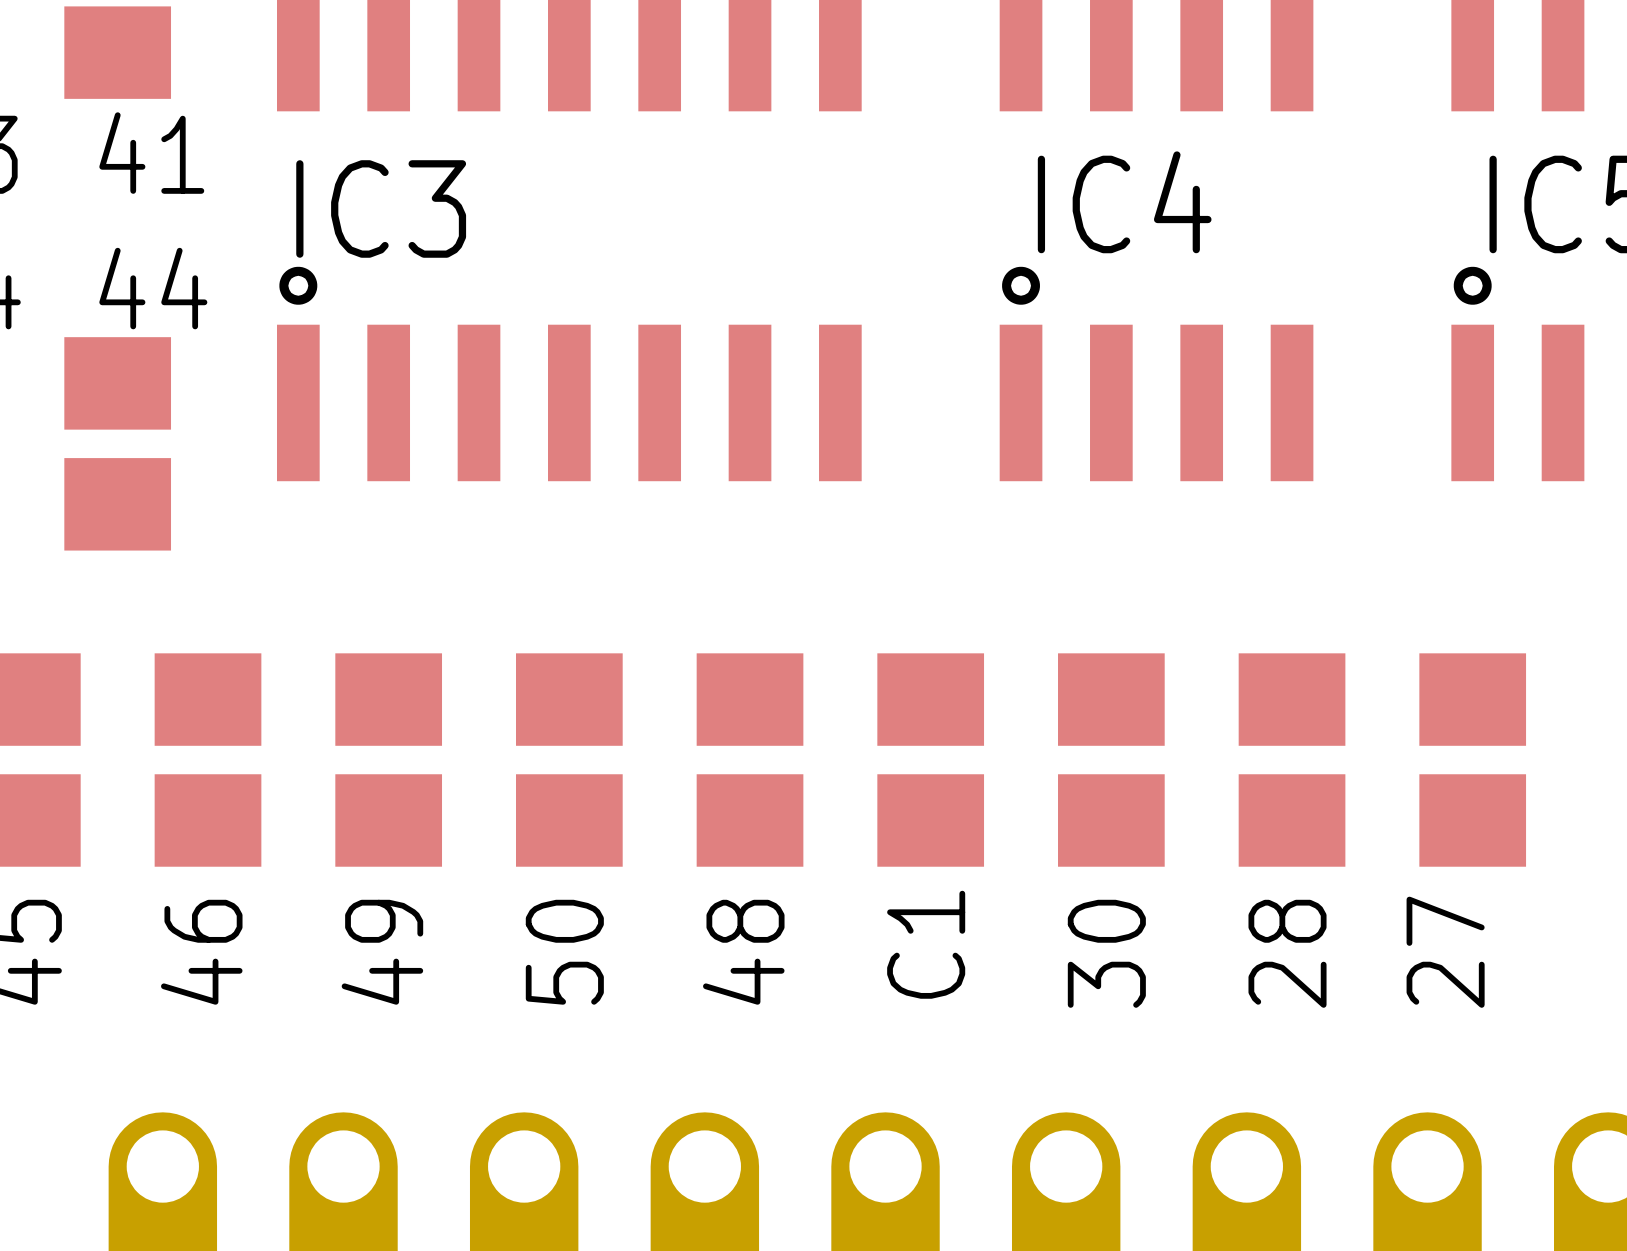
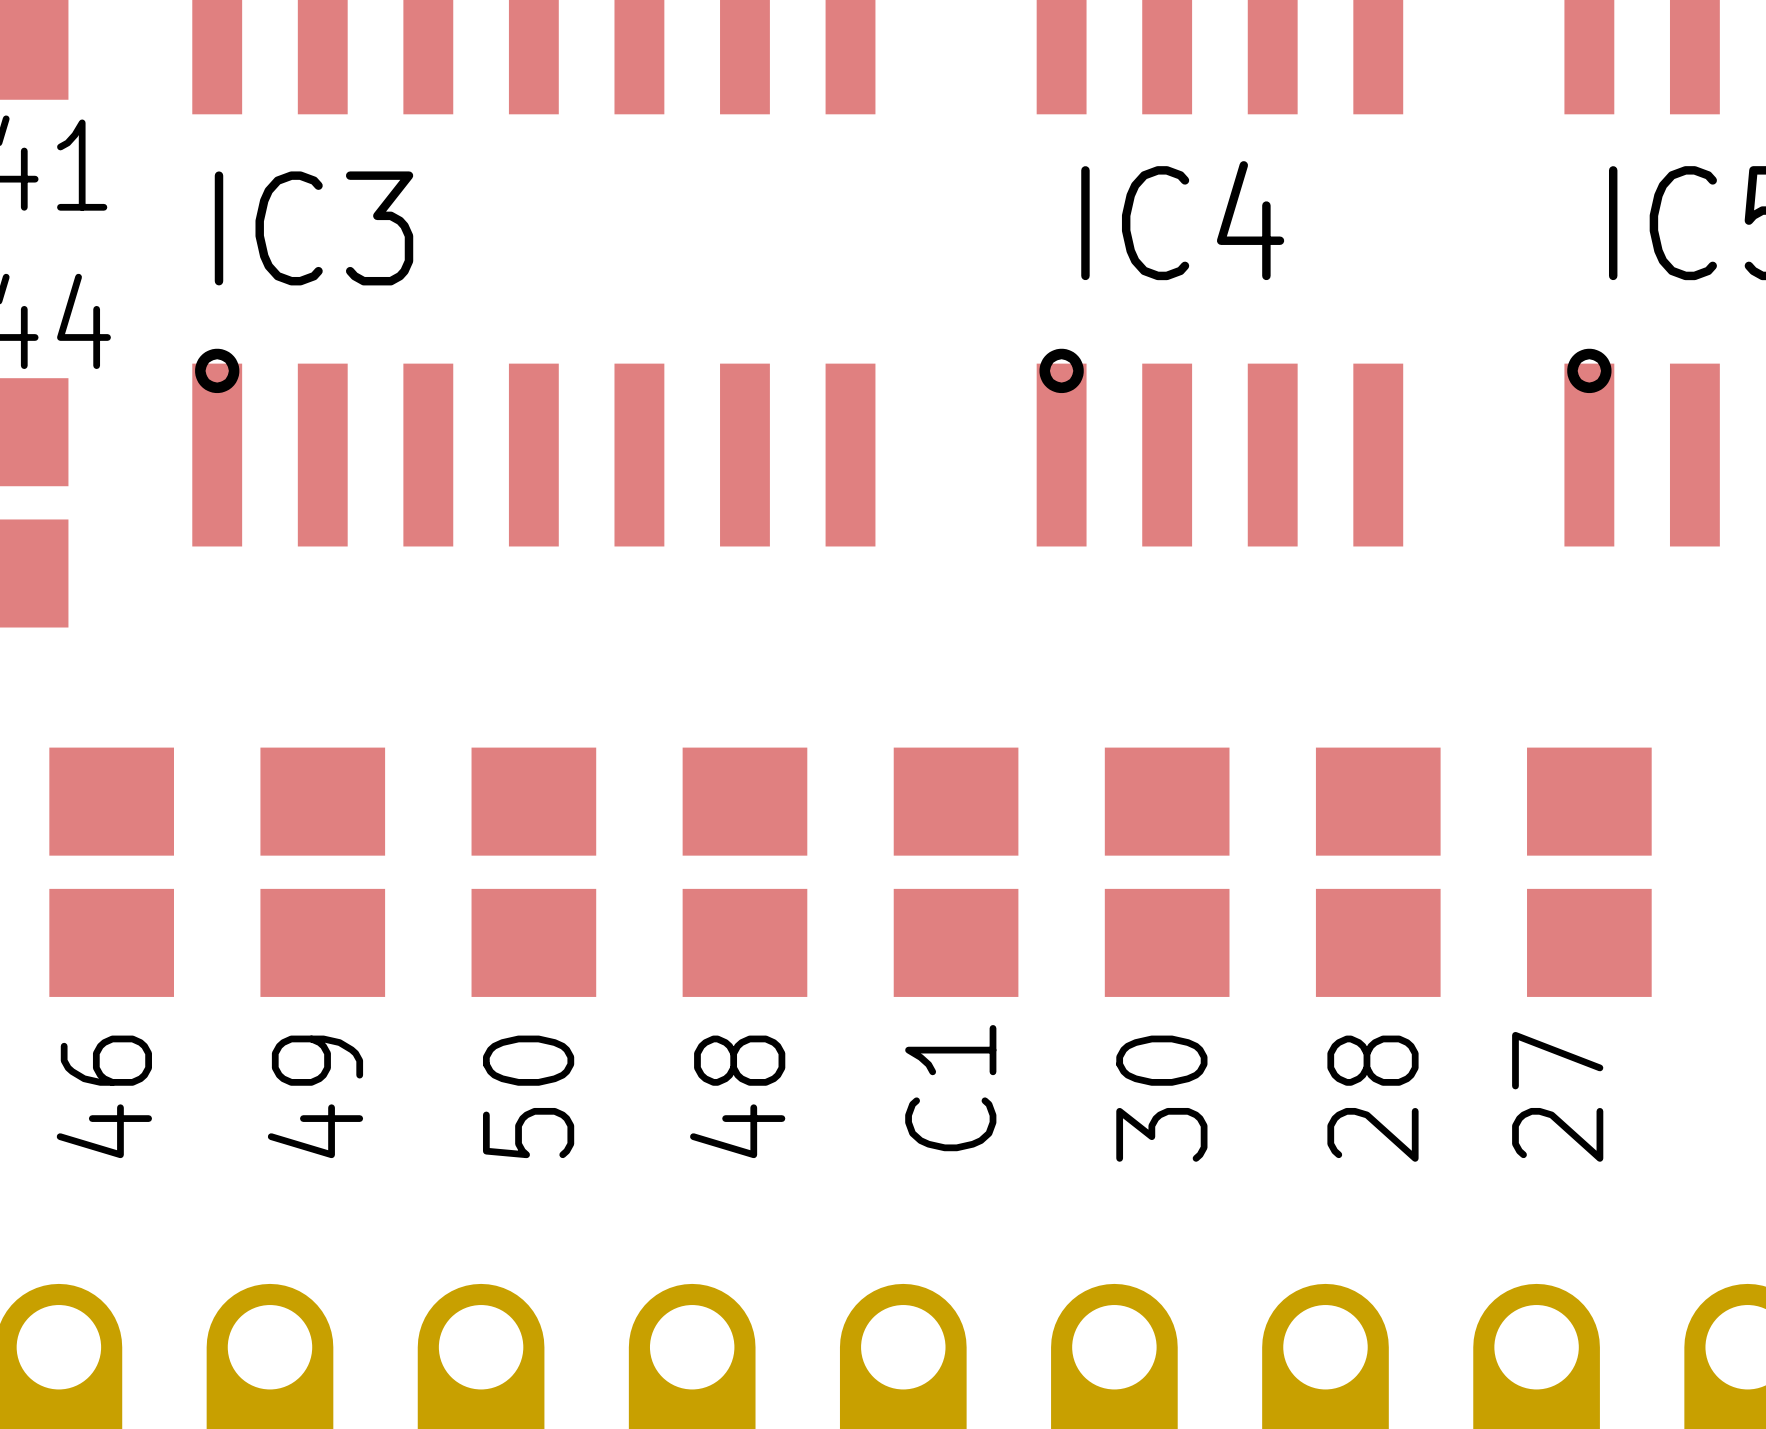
drawing position: (298, 285) -> (217, 370)
drawing position: (1021, 285) -> (1061, 370)
drawing position: (1472, 285) -> (1589, 370)

